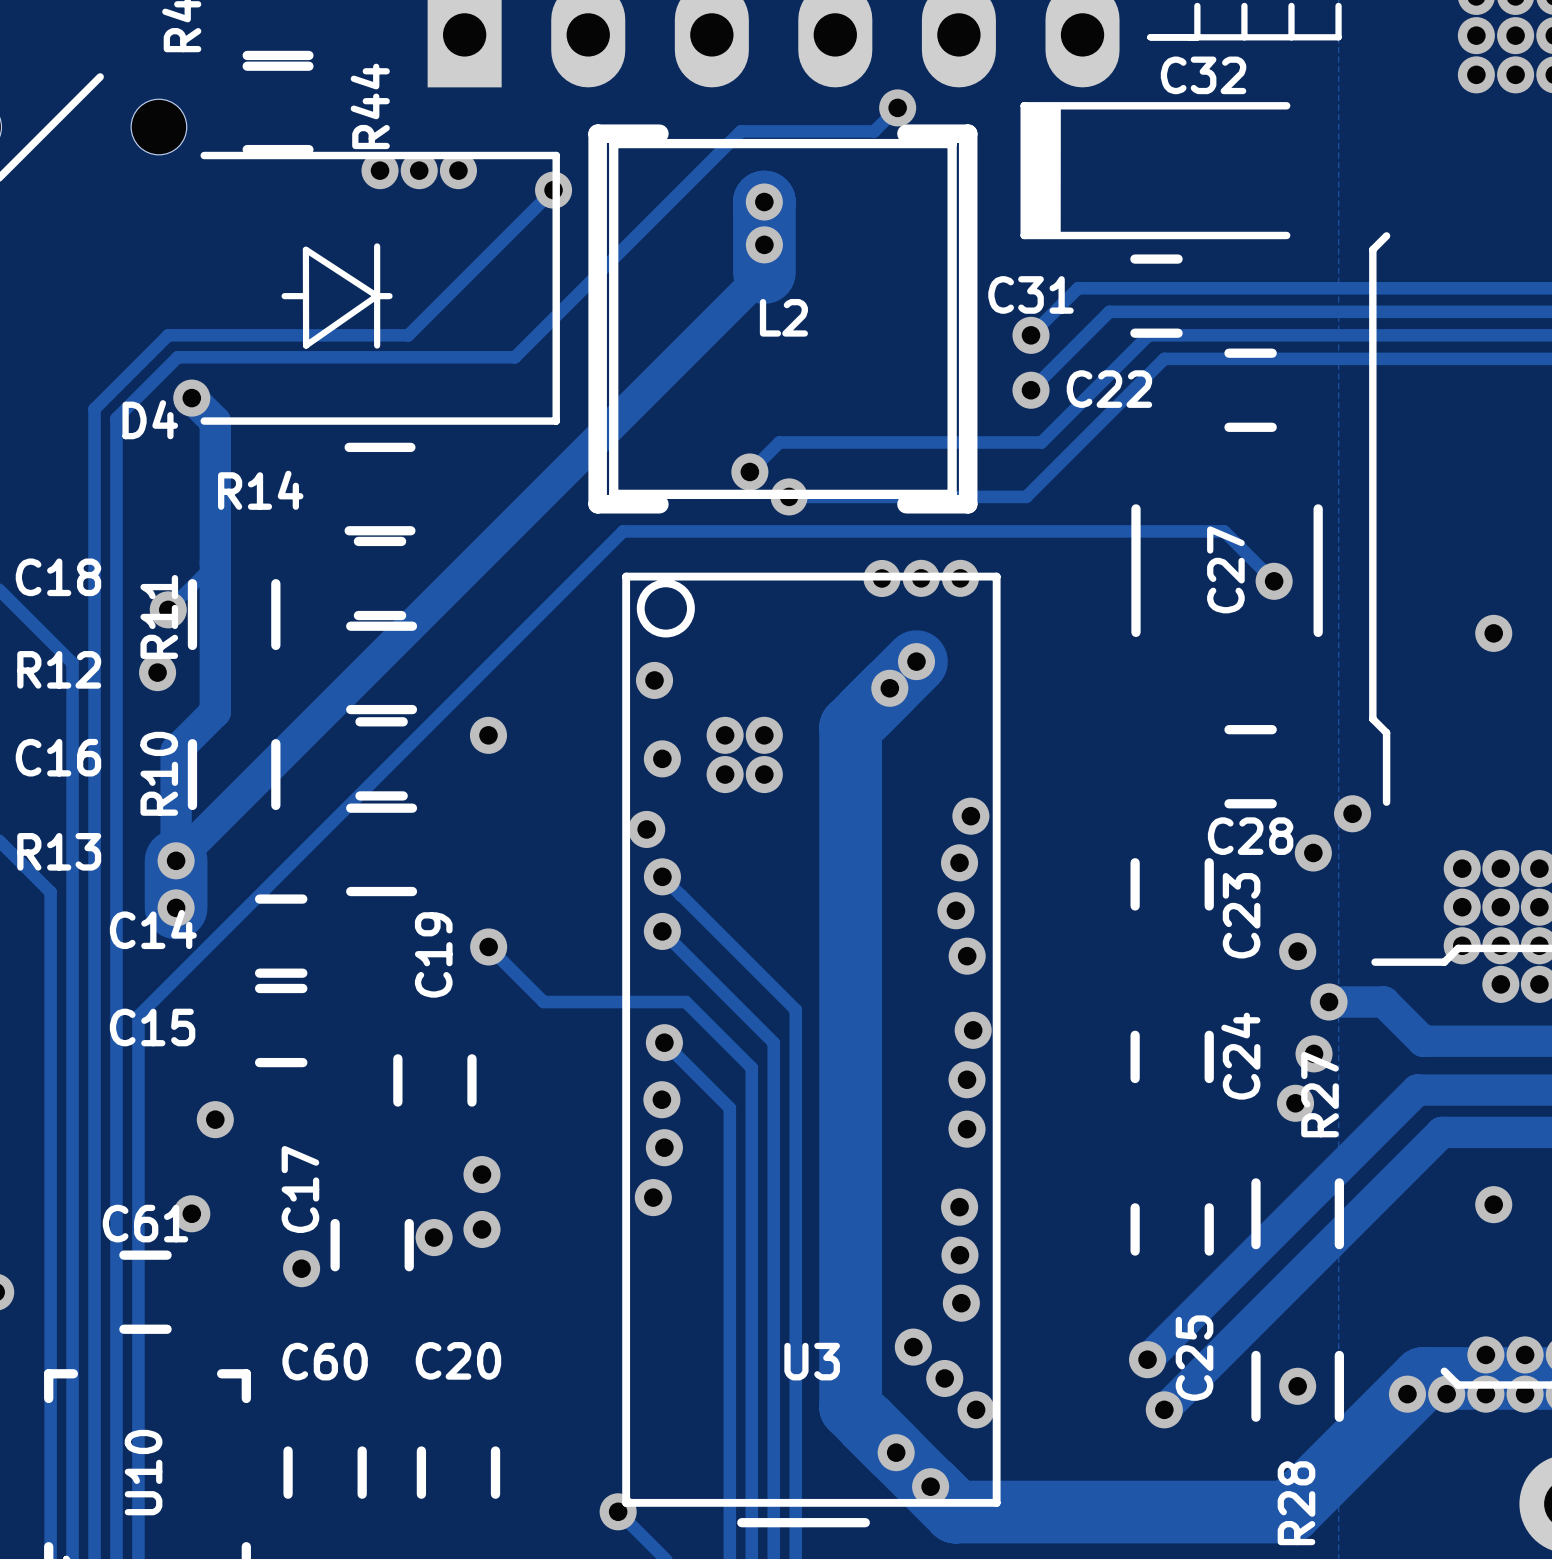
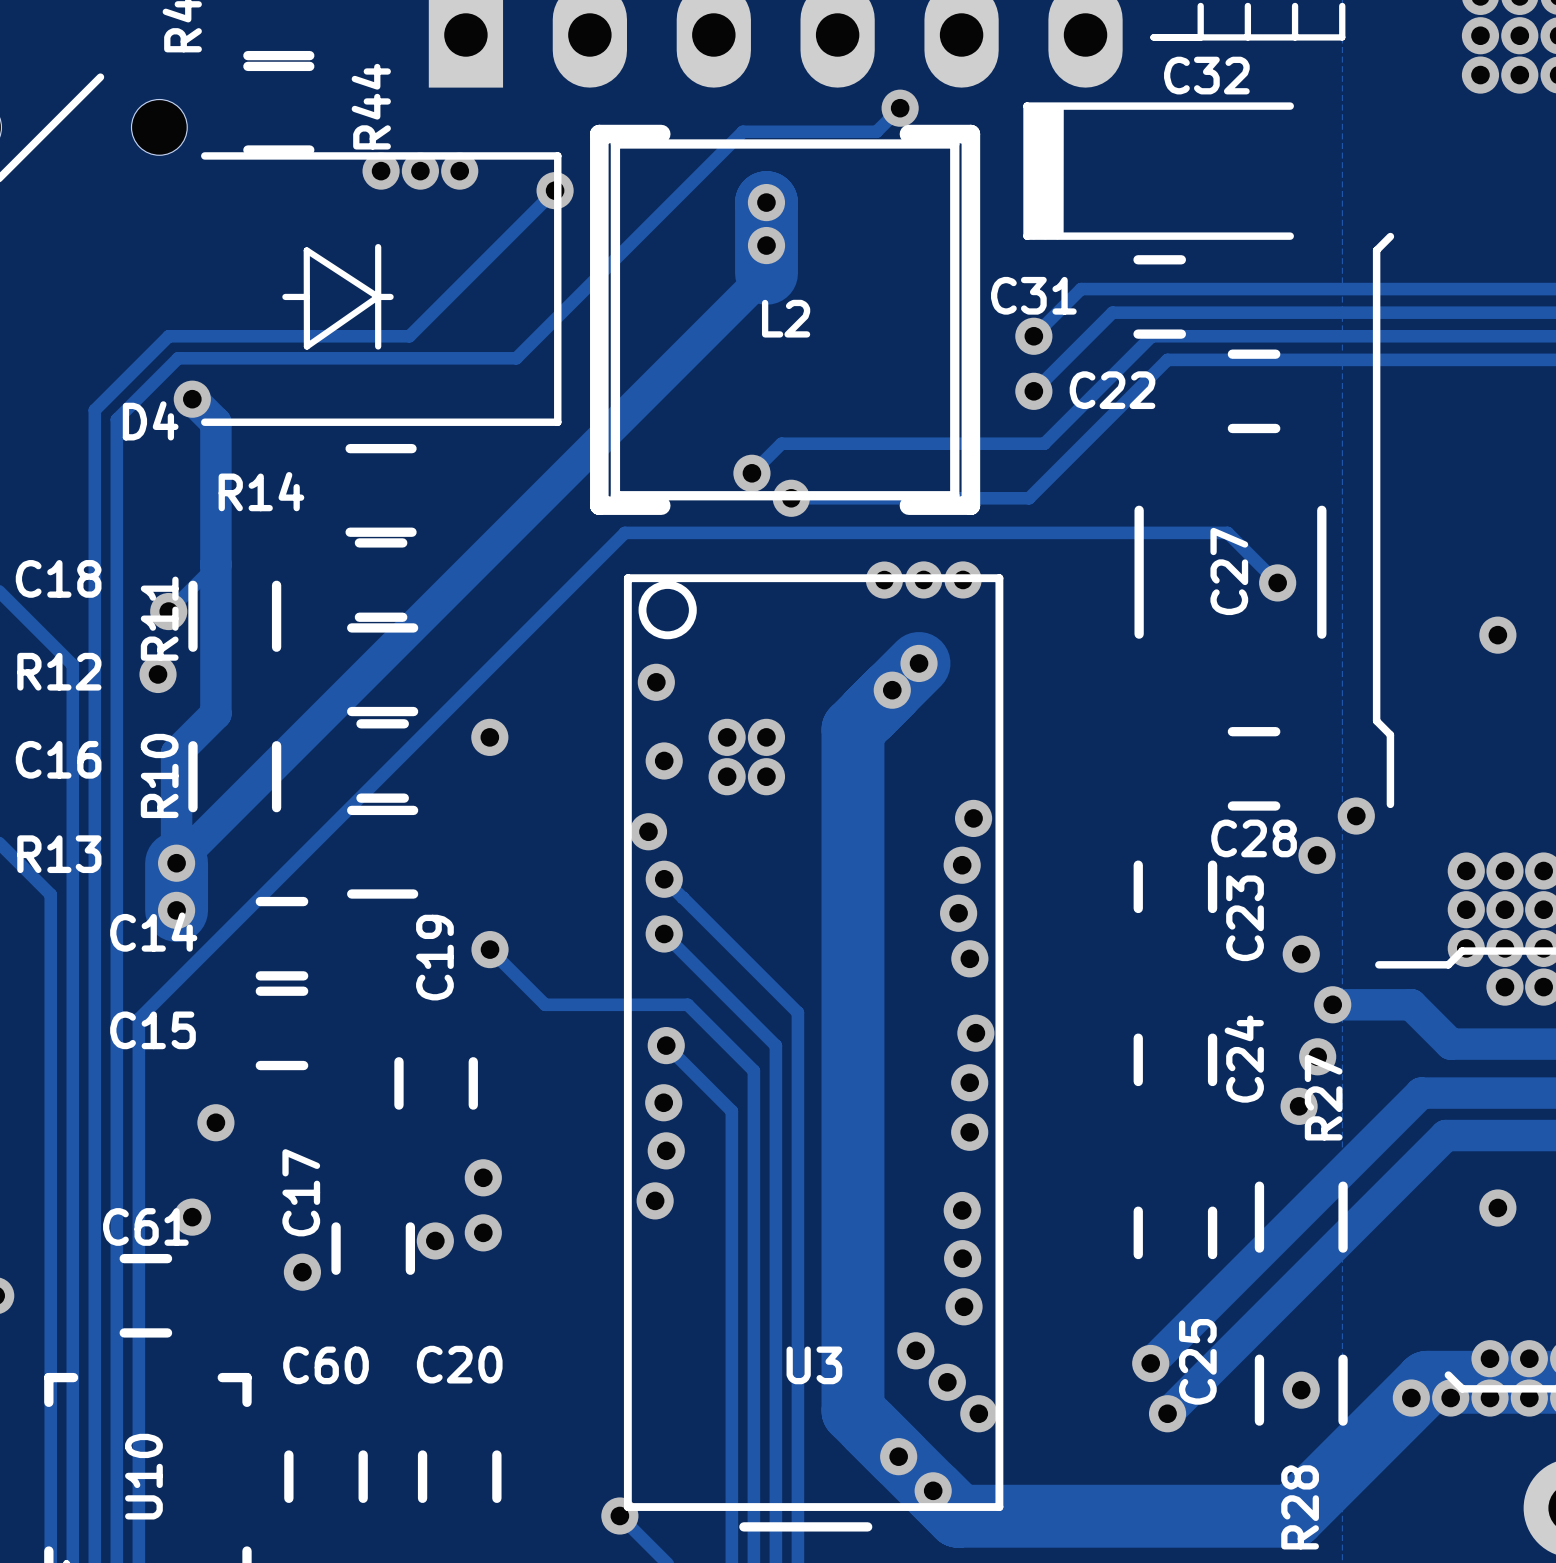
track: (1383, 1002) (1423, 1041) (1446, 1041) -> (1387, 1004) (1411, 1004) (1450, 1044)

